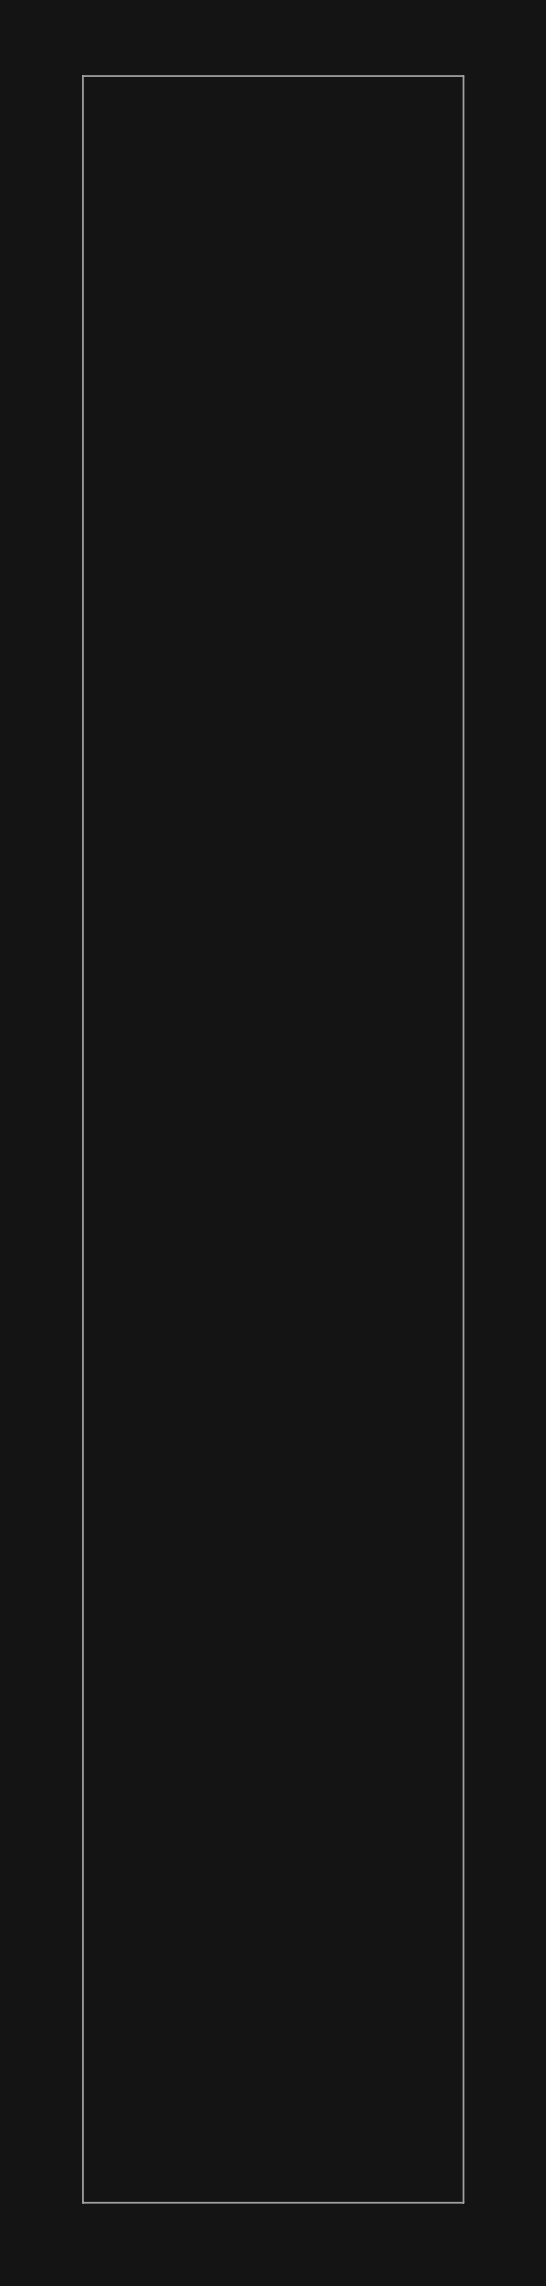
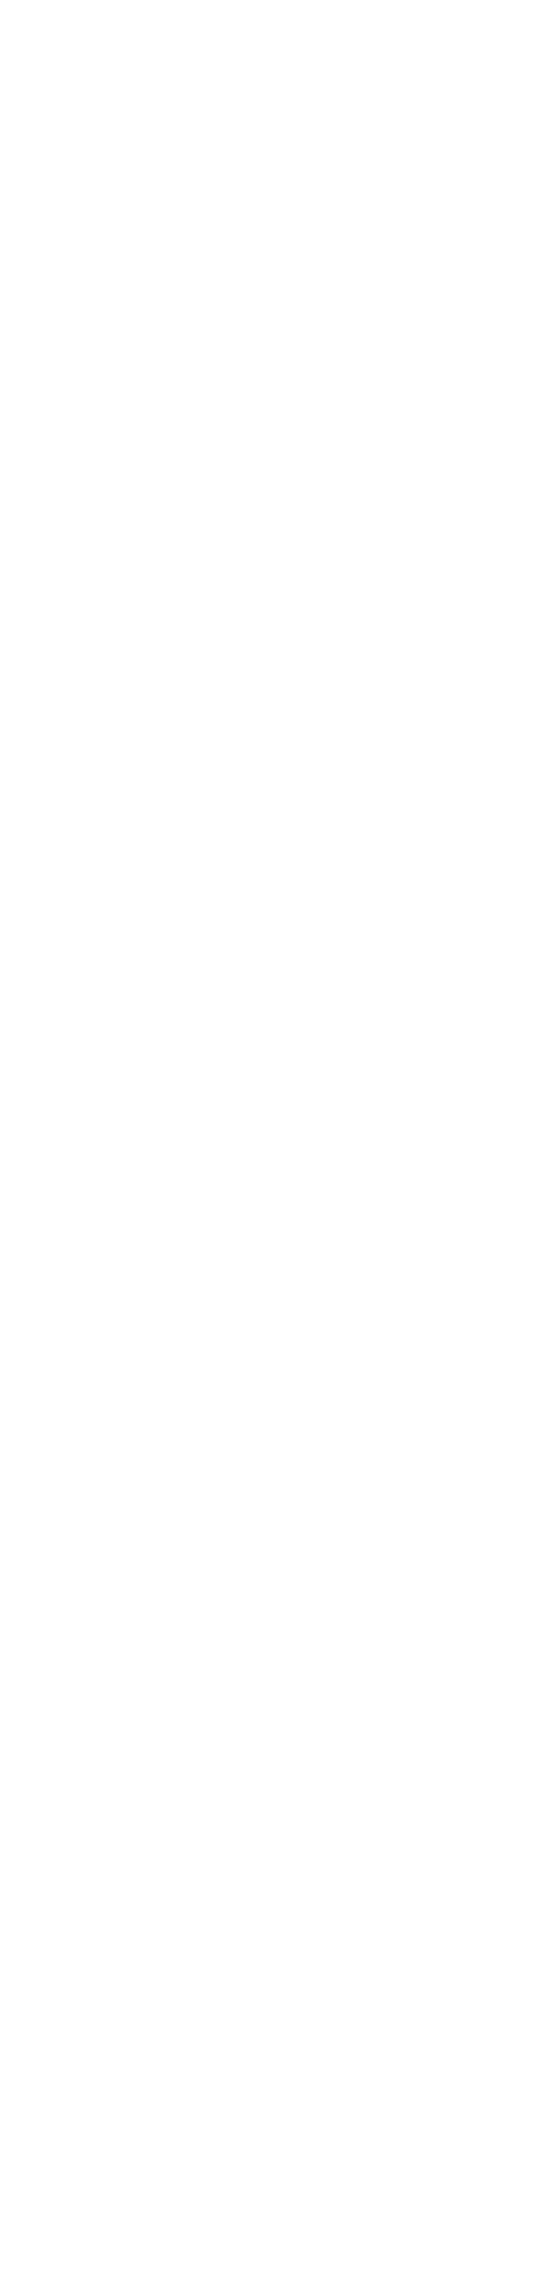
board edge: (82, 76) (463, 76) (463, 2202) (82, 2202) (82, 76) -> none

